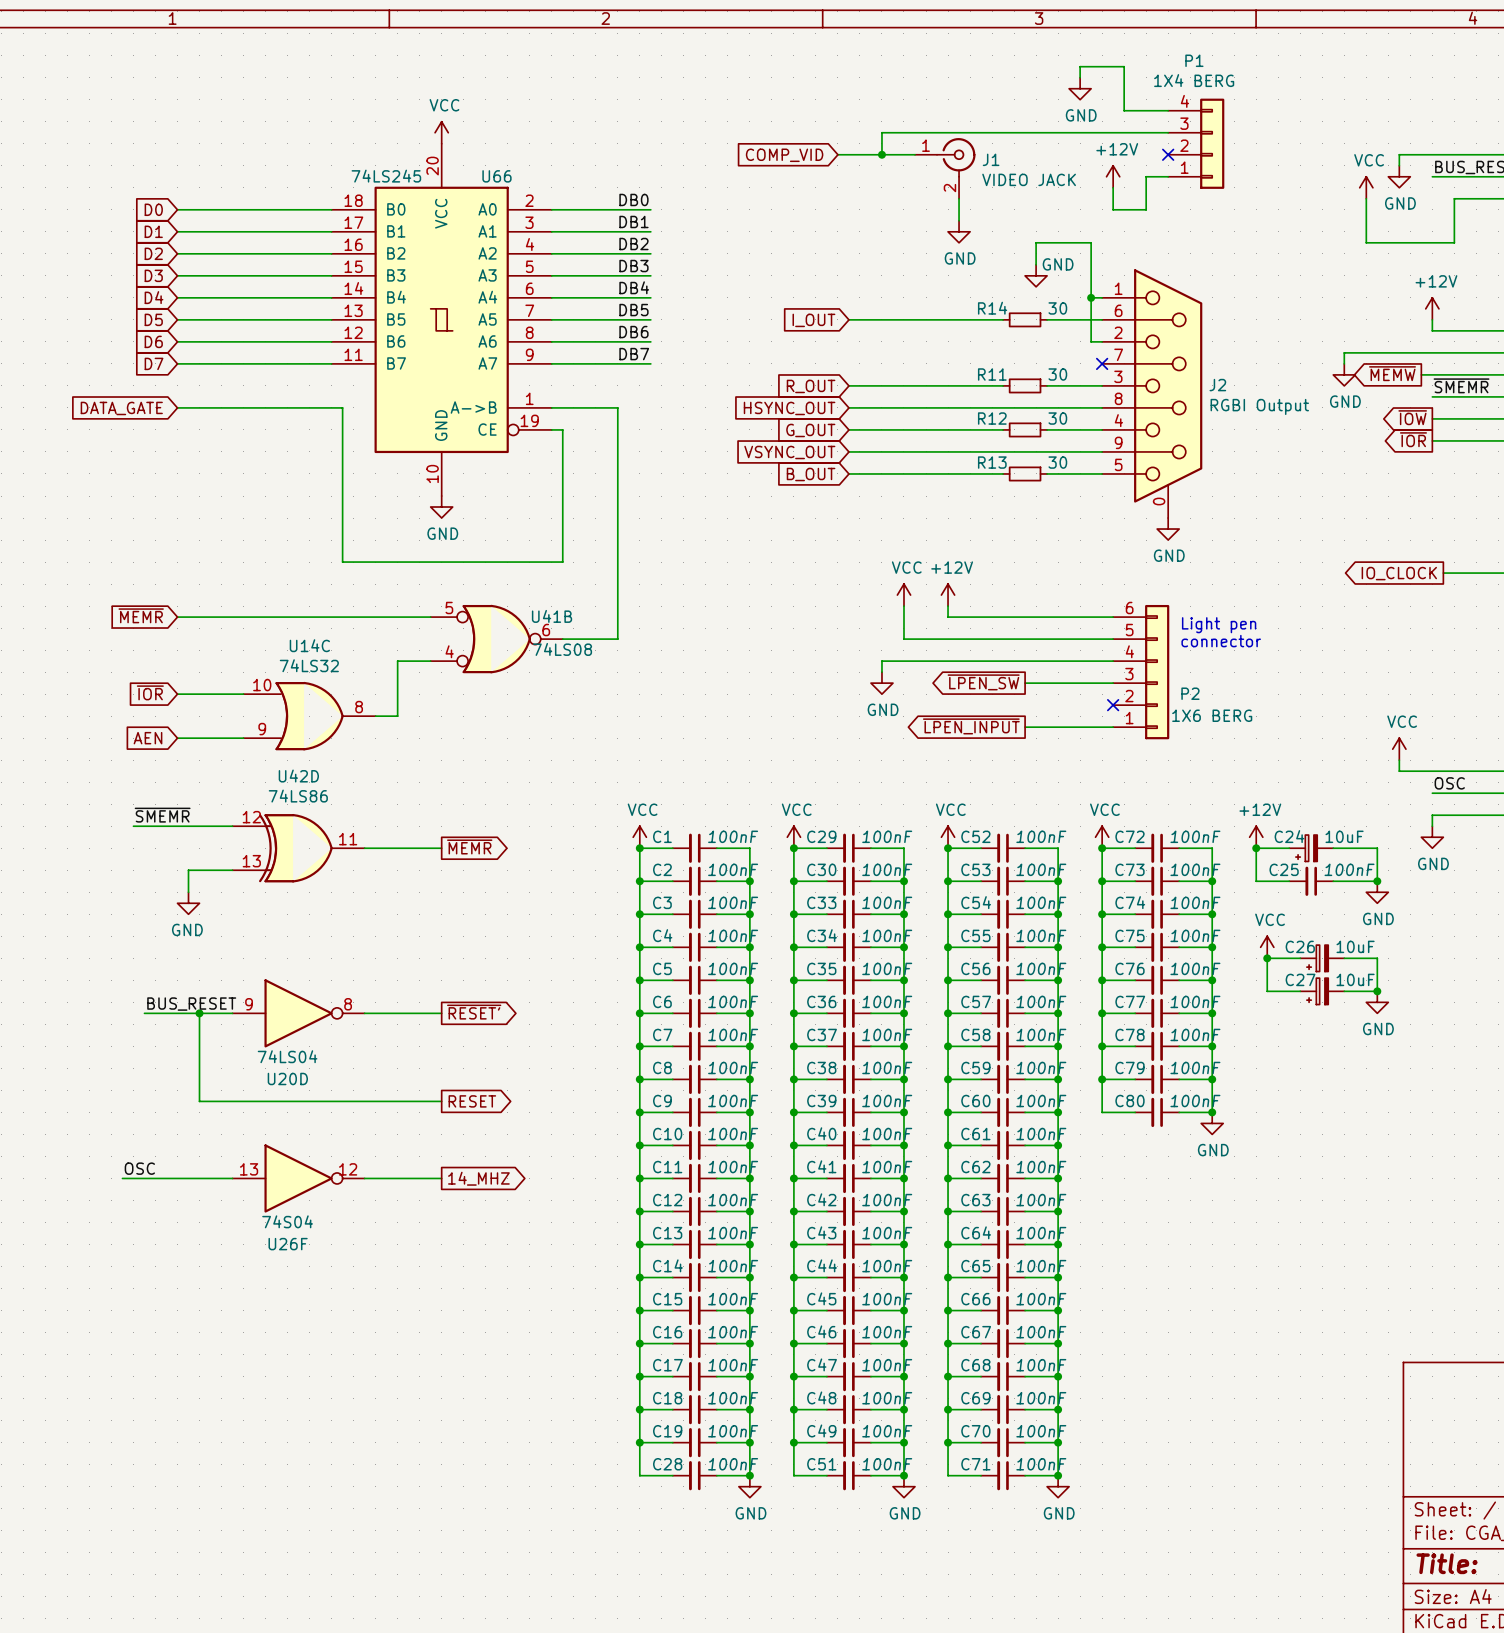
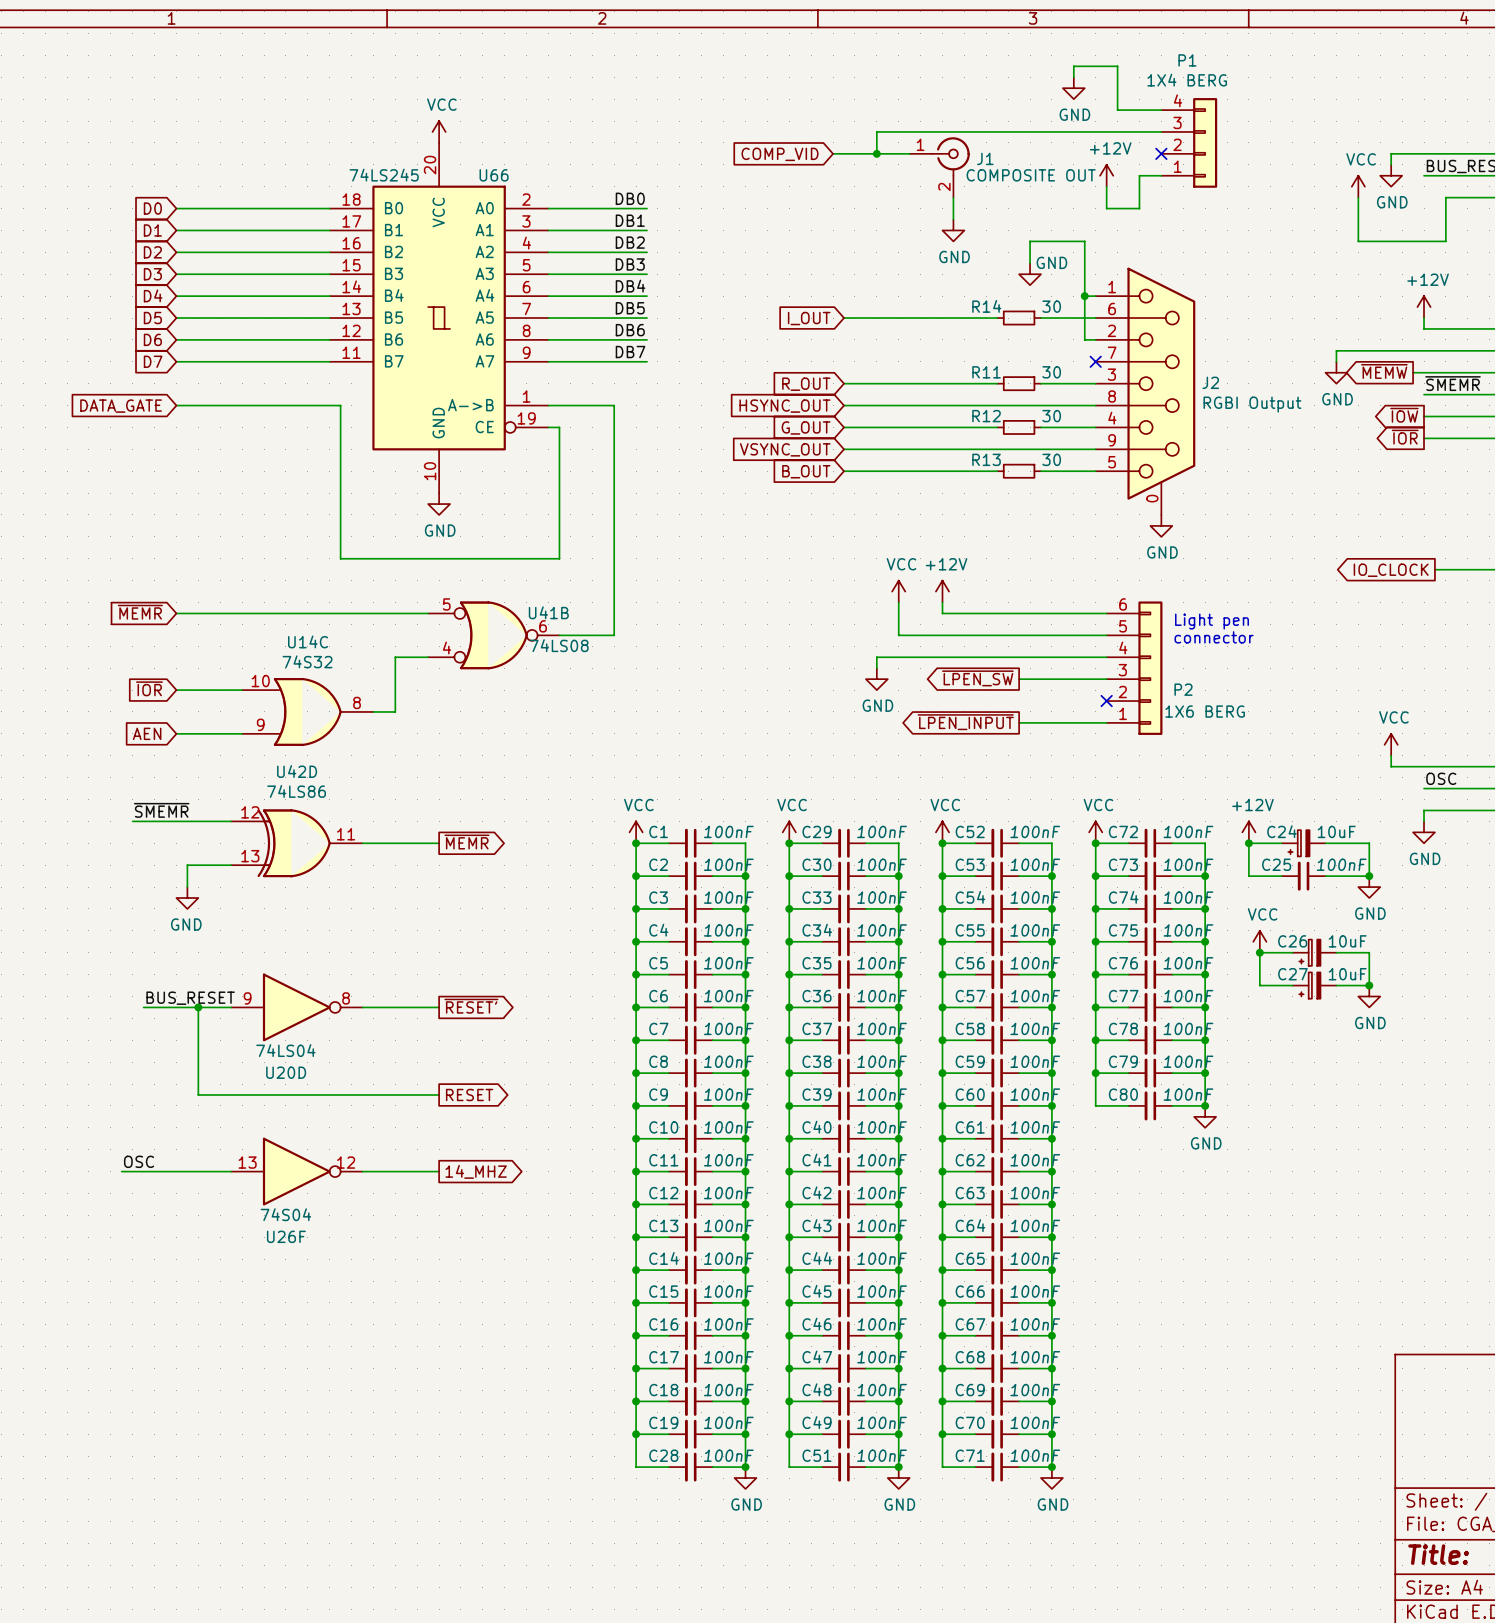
J1 value: VIDEO JACK (1029, 179) -> COMPOSITE OUT (1031, 175)
U14C value: 74LS32 (309, 665) -> 74S32 (307, 661)

